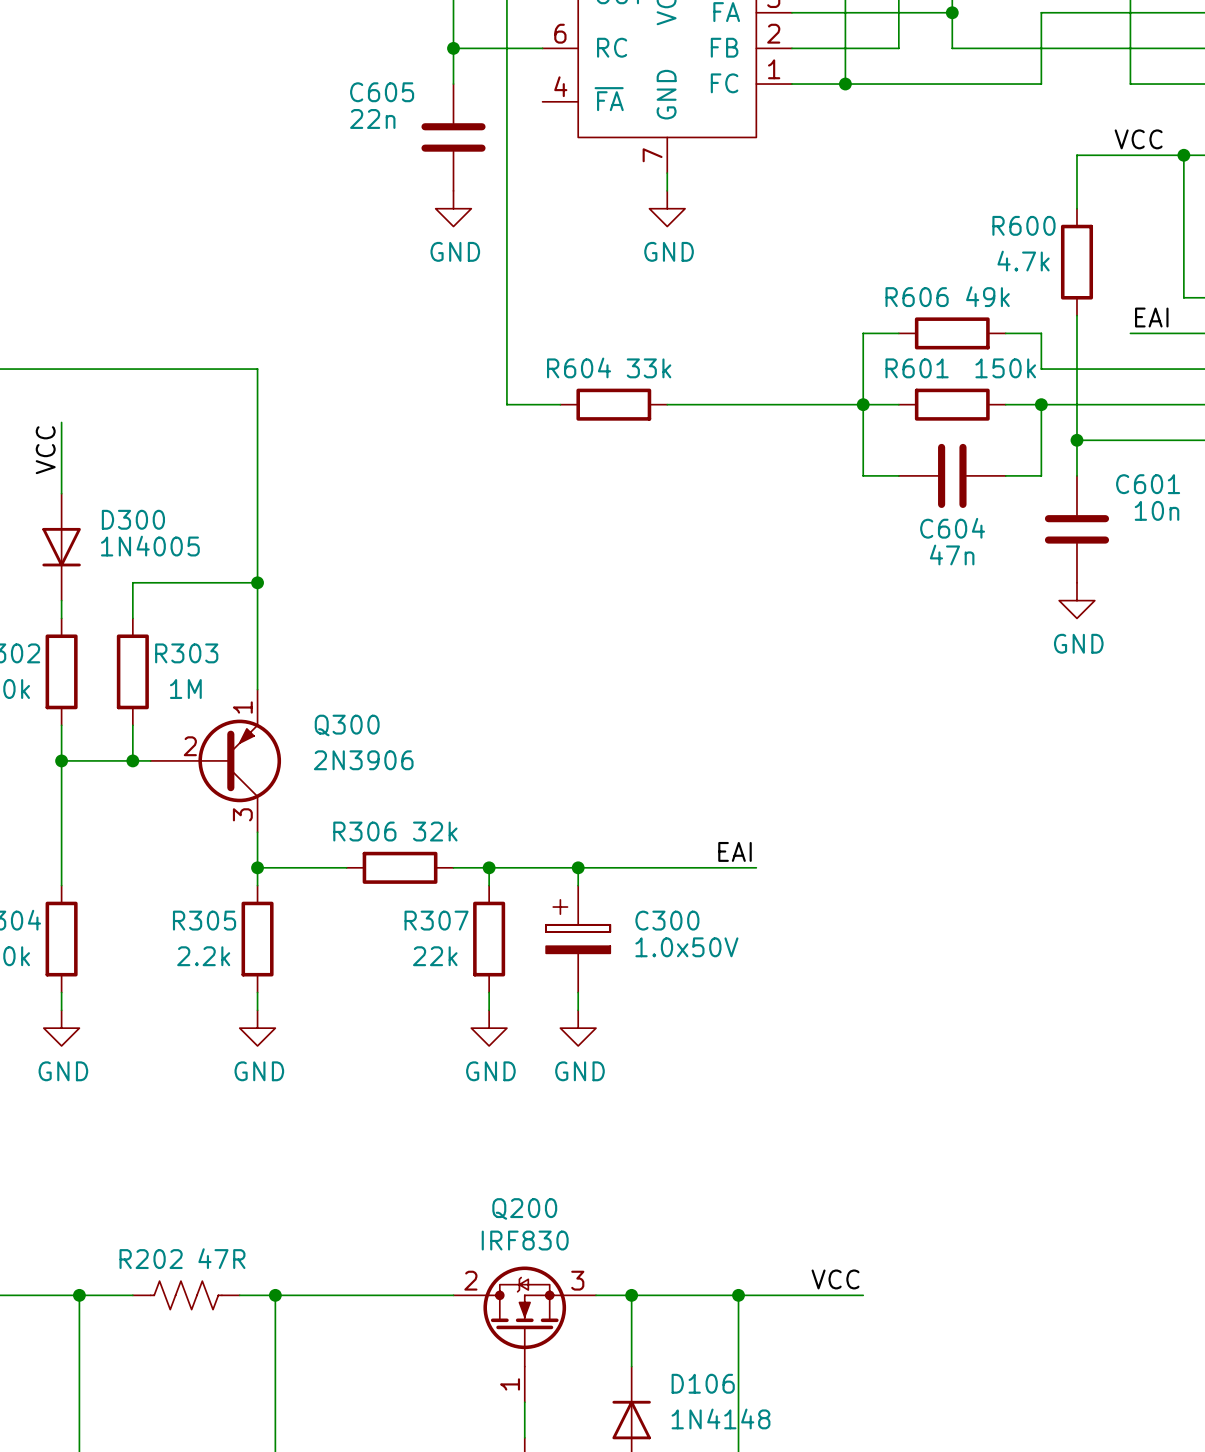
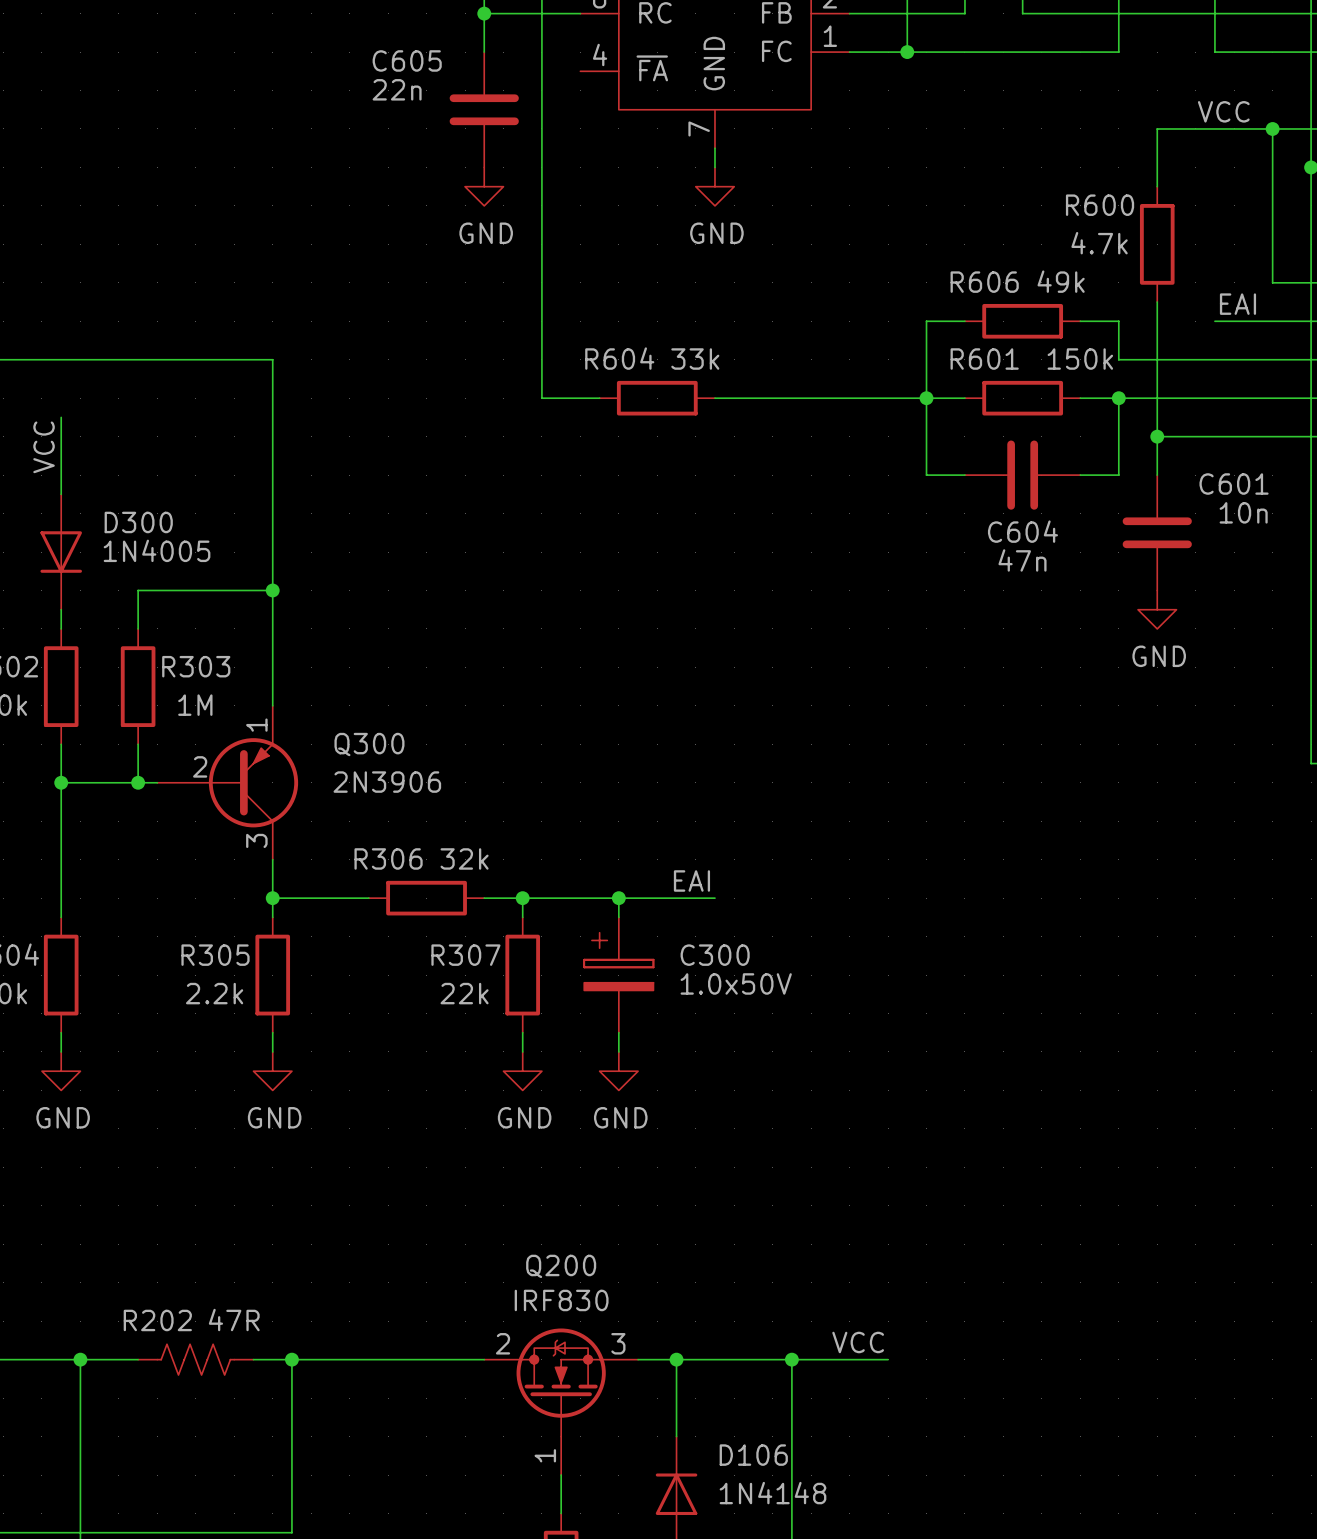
label position: EAI (734, 851) -> EAI (691, 880)
wire: (667, 867) (756, 867) -> none
label position: VCC (835, 1279) -> VCC (858, 1342)
wire: (827, 1295) (863, 1295) -> none

